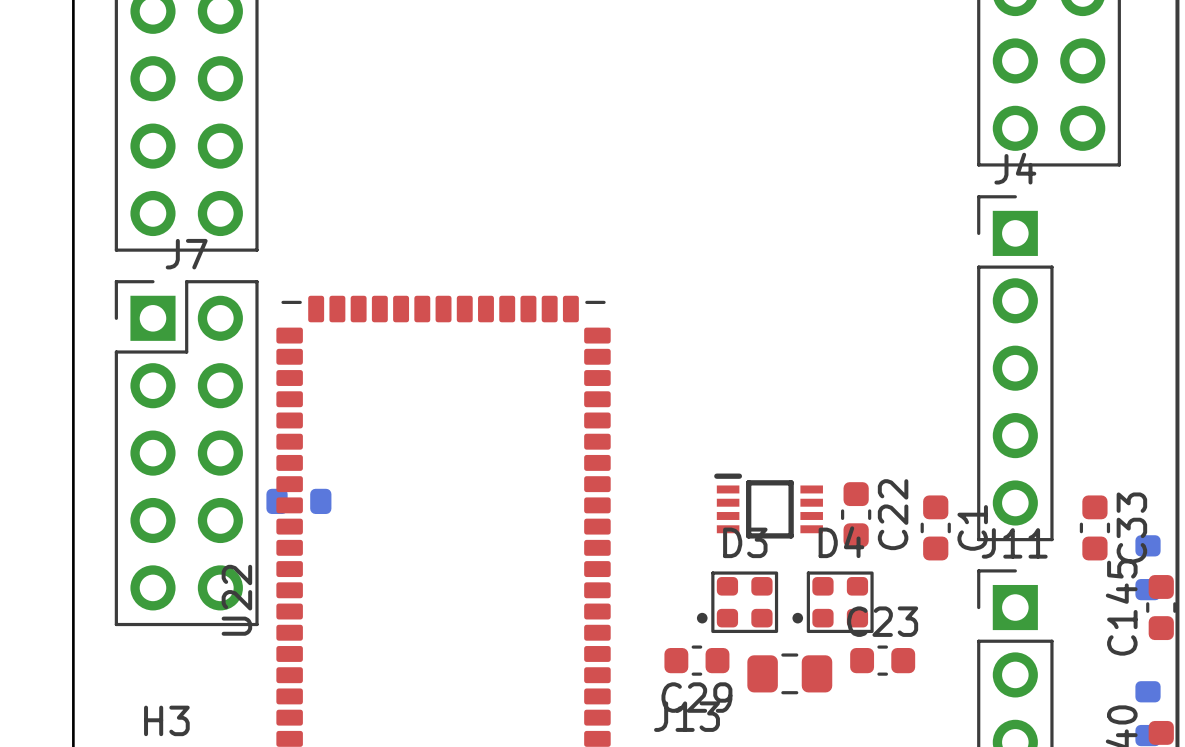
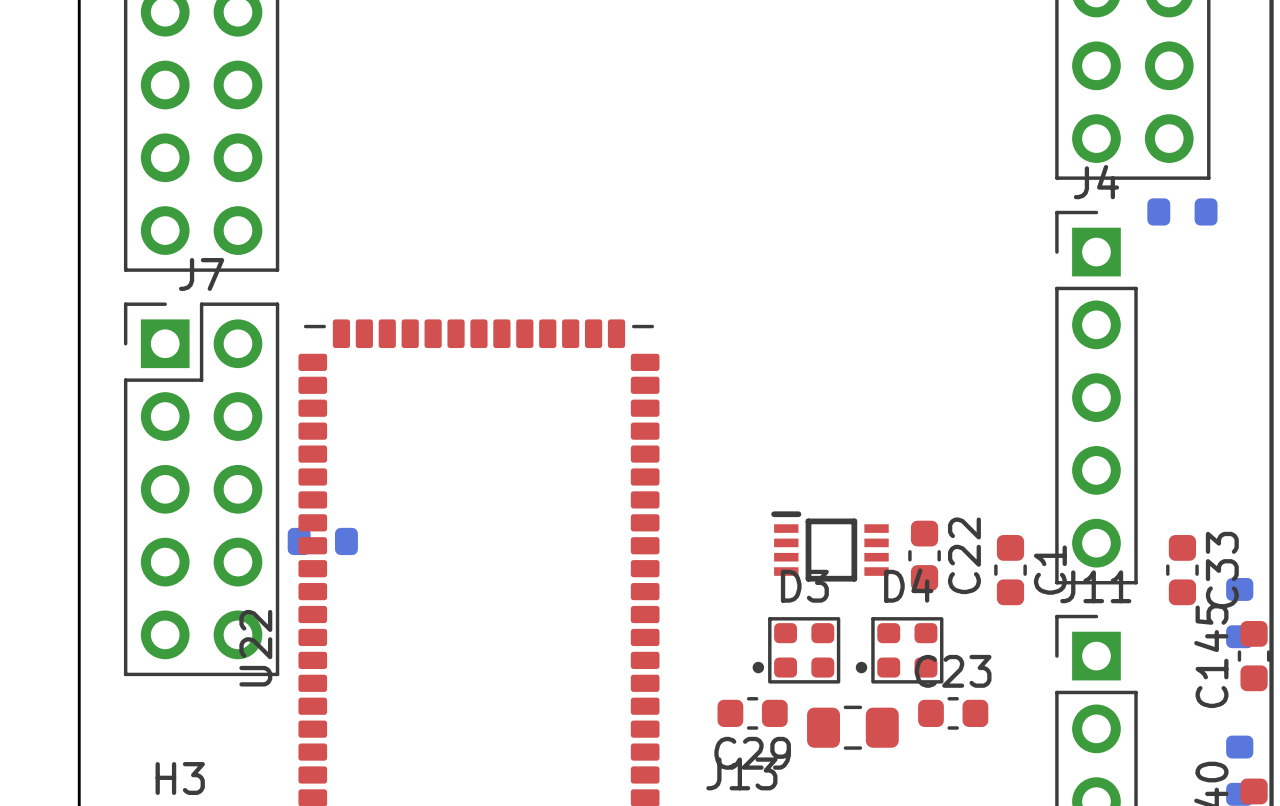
part: none -> (1182, 211)

